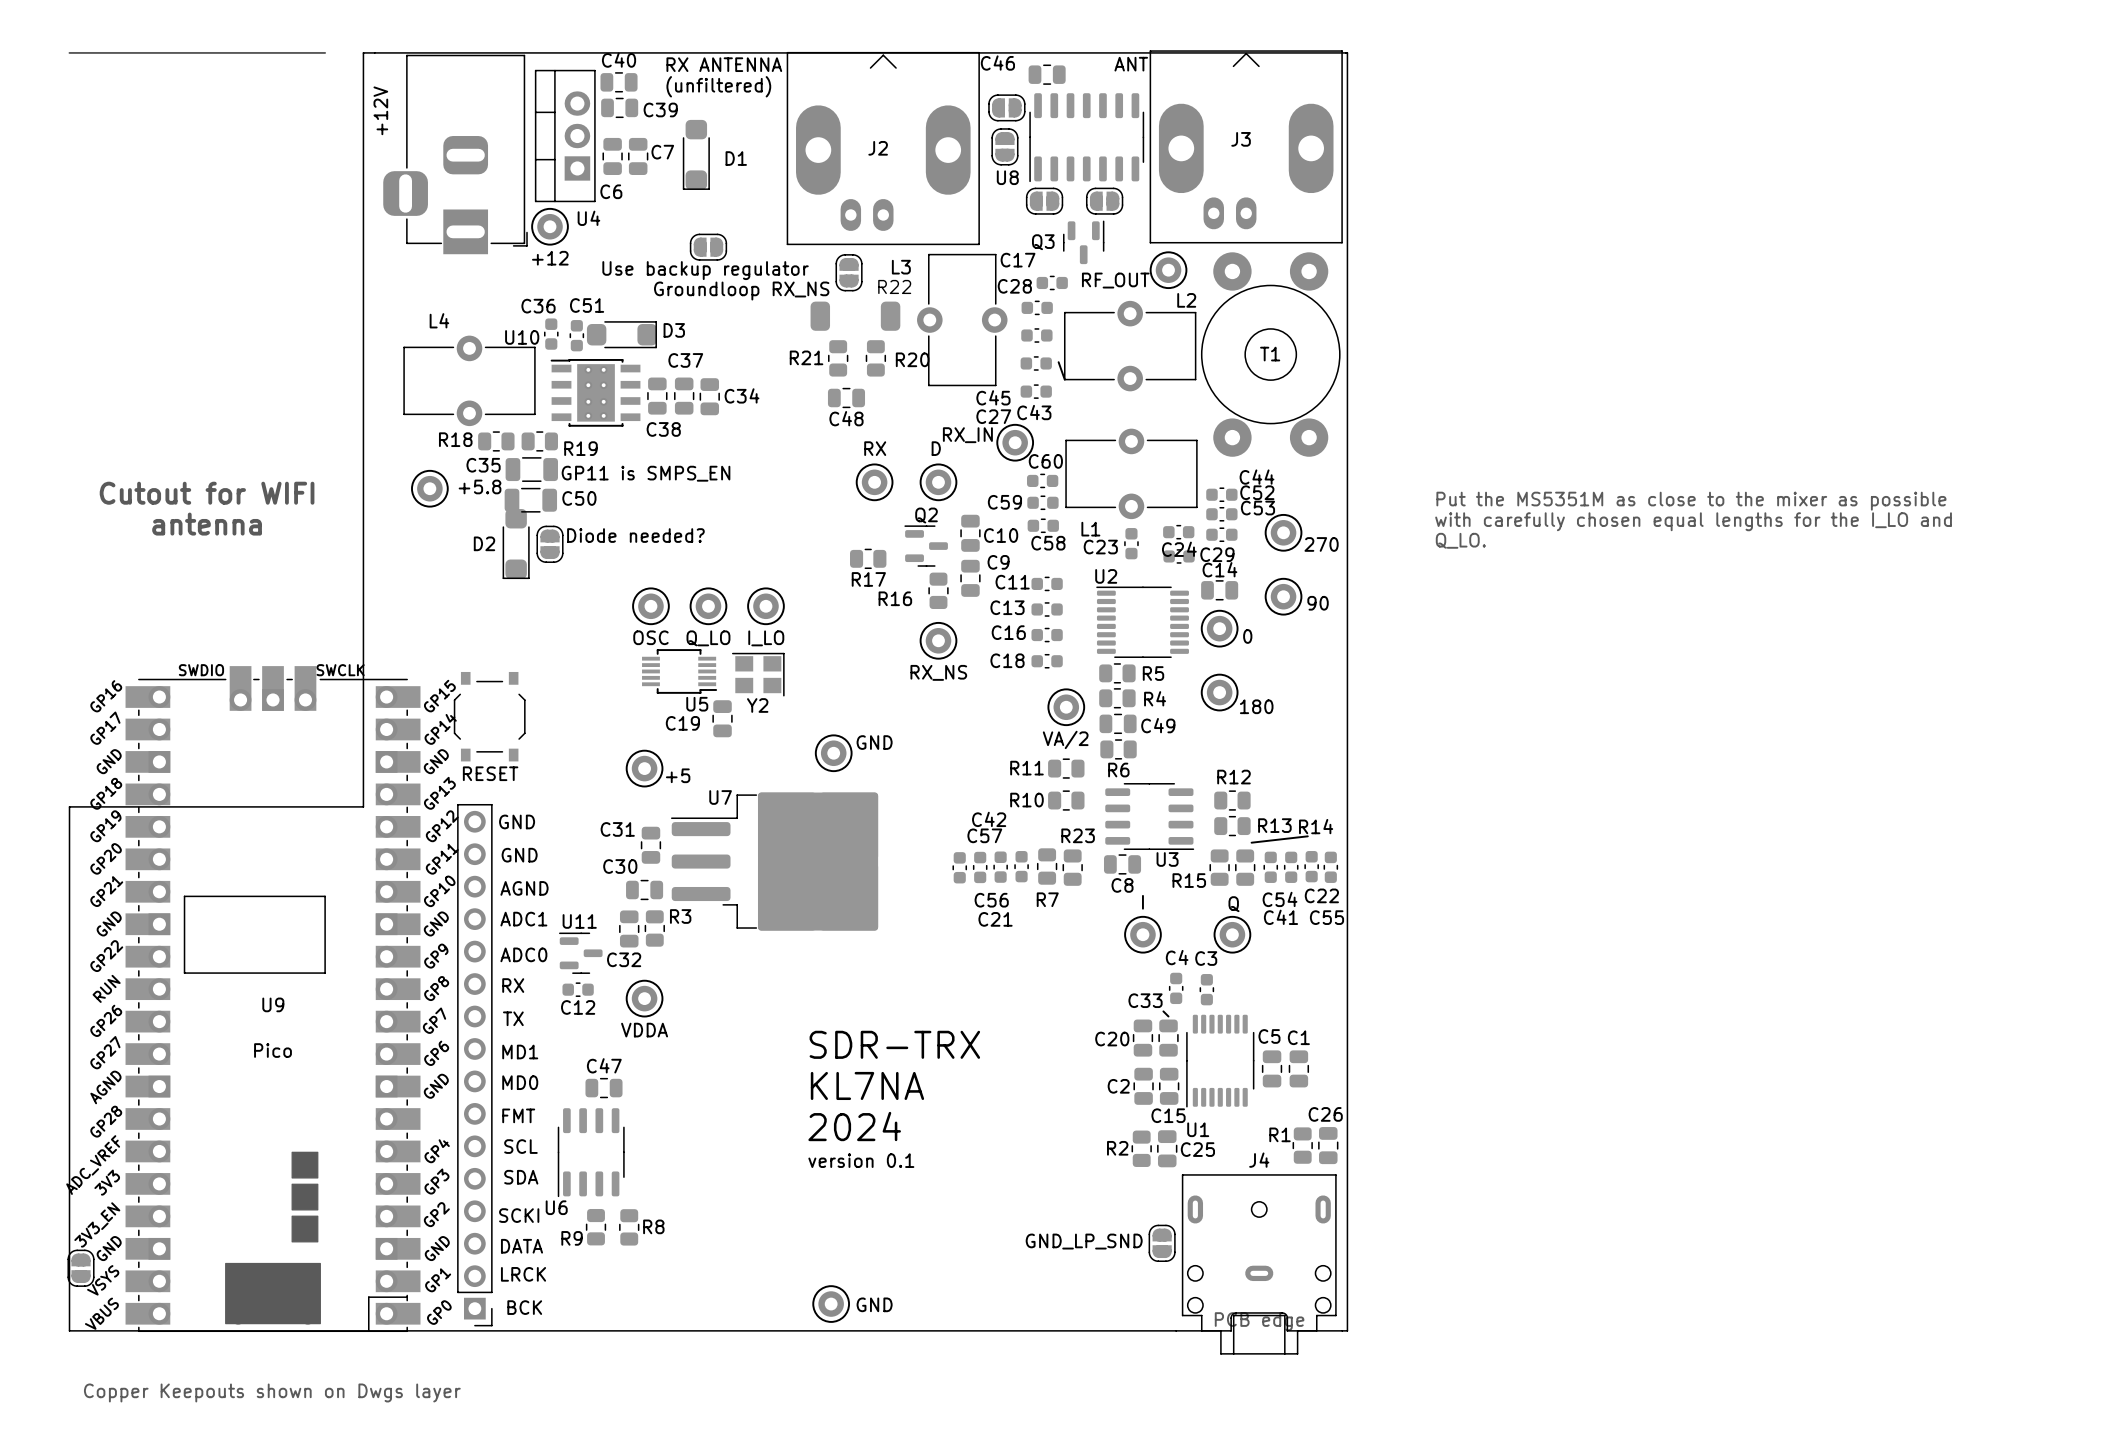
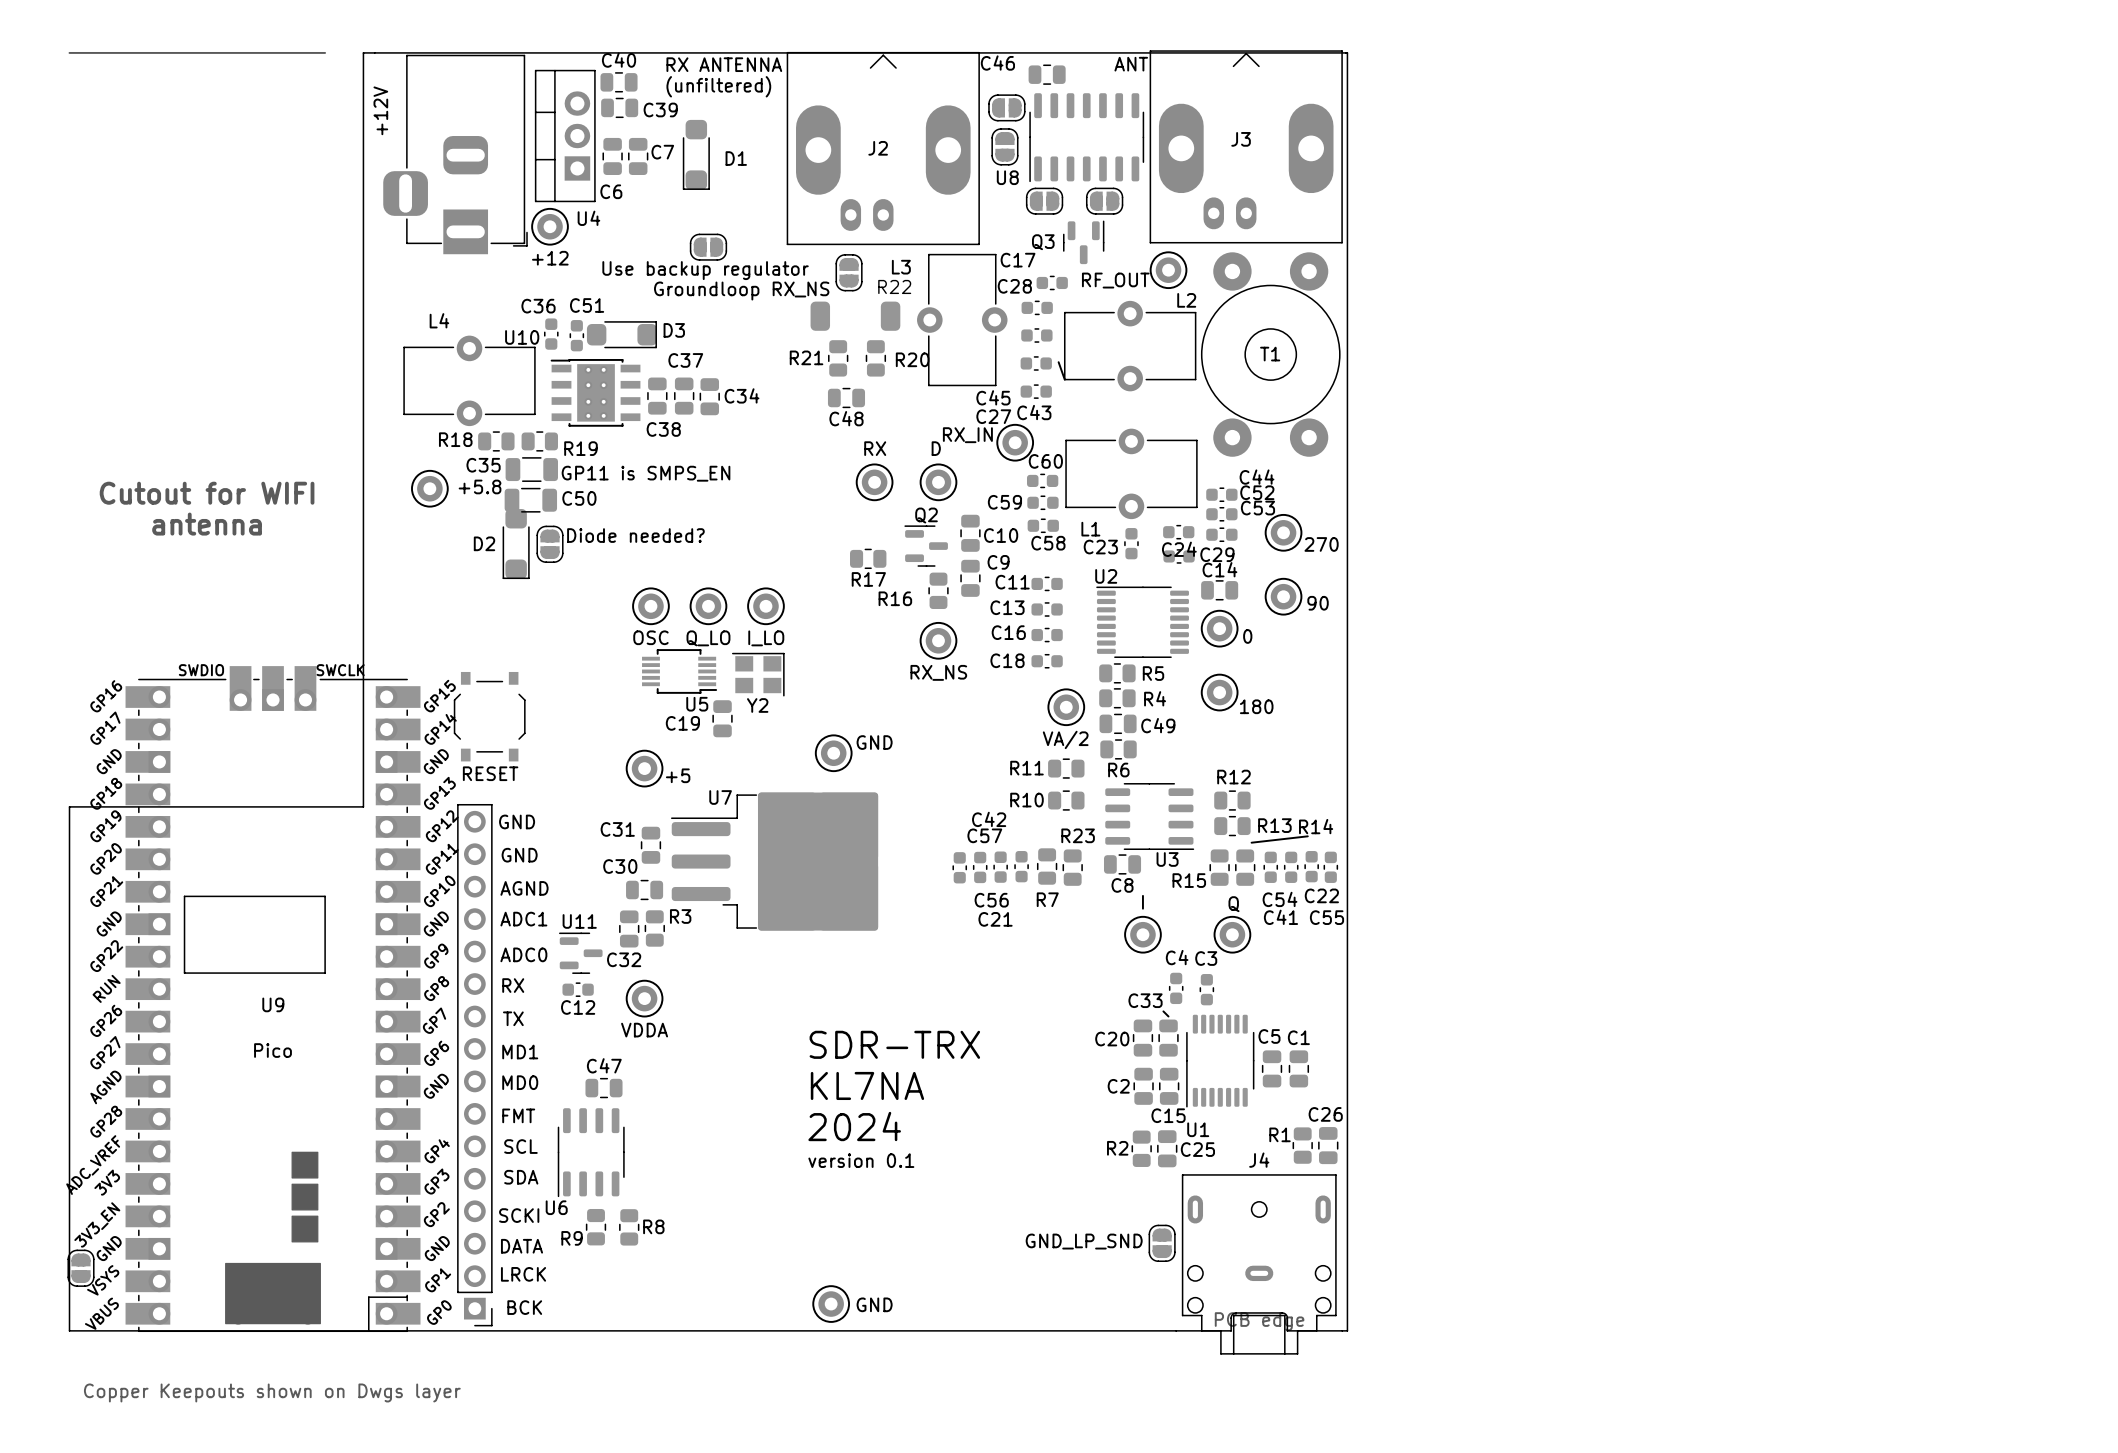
text: Put the MS5351M as close to the mixer as possible (1691, 501) -> none
text: with carefully chosen equal lengths for the I_LO and (1693, 521) -> none
text: Q_LO. (1460, 540) -> none

